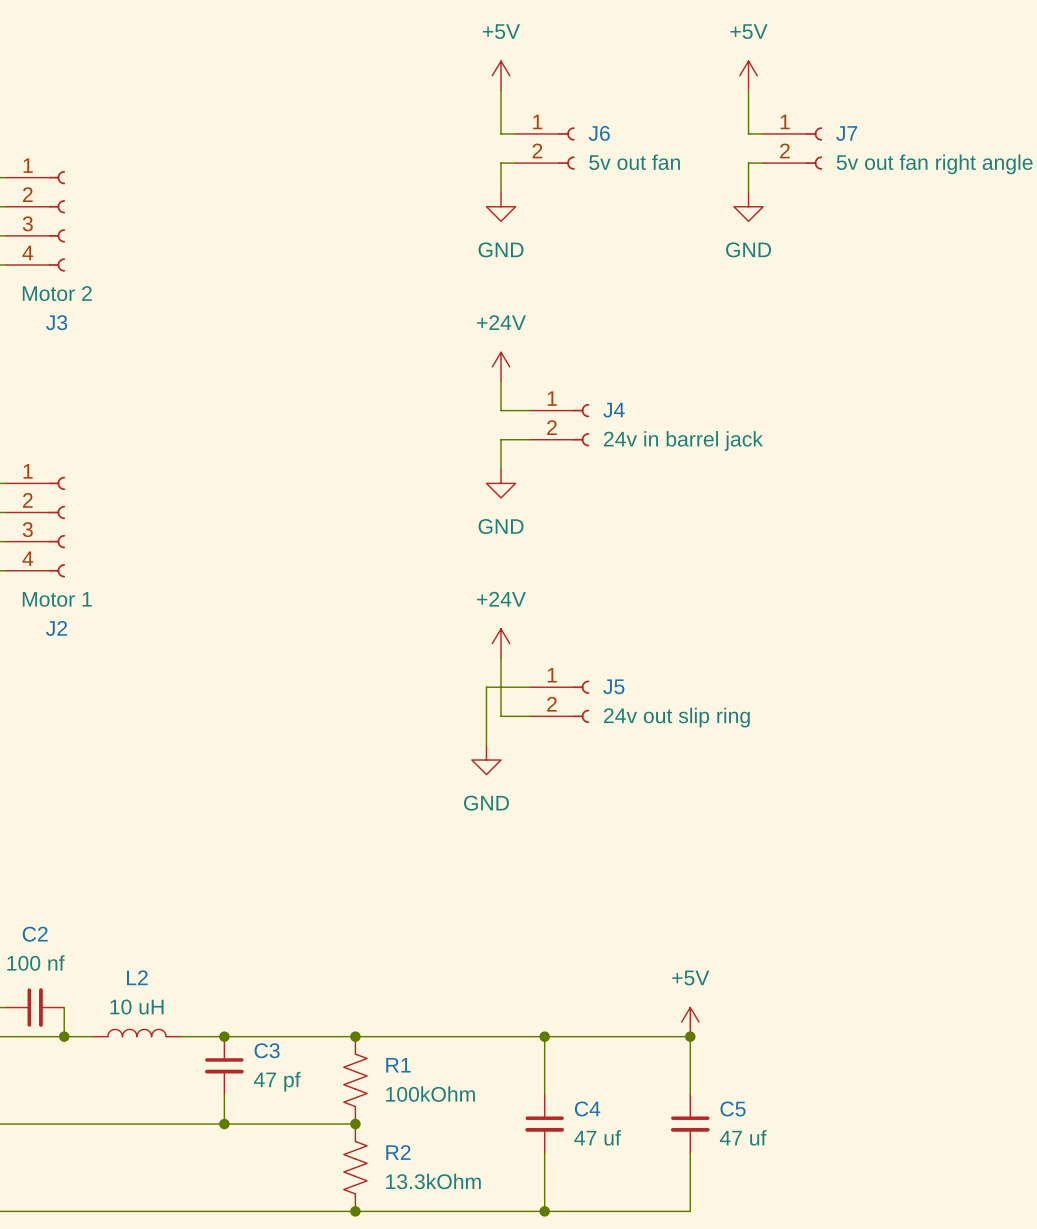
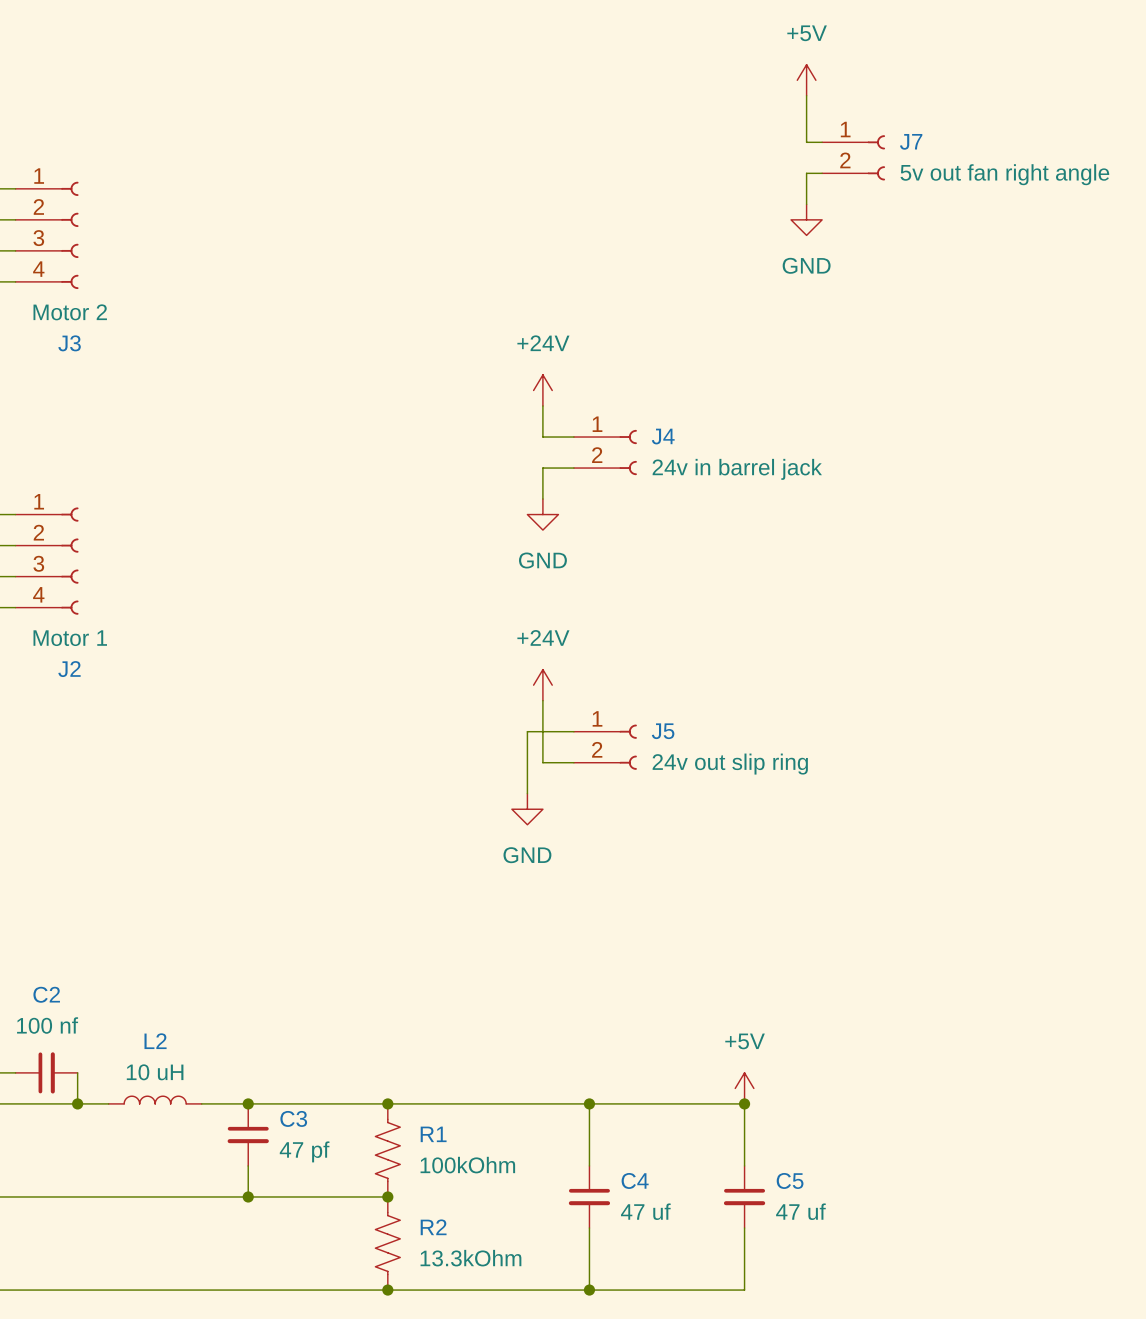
power symbol: +5V (501, 75) -> none
wire: (501, 90) (501, 133) (515, 133) -> none
J6: 5v out fan (545, 148) -> none
wire: (515, 163) (501, 163) (501, 192) -> none
power symbol: GND (501, 206) -> none

